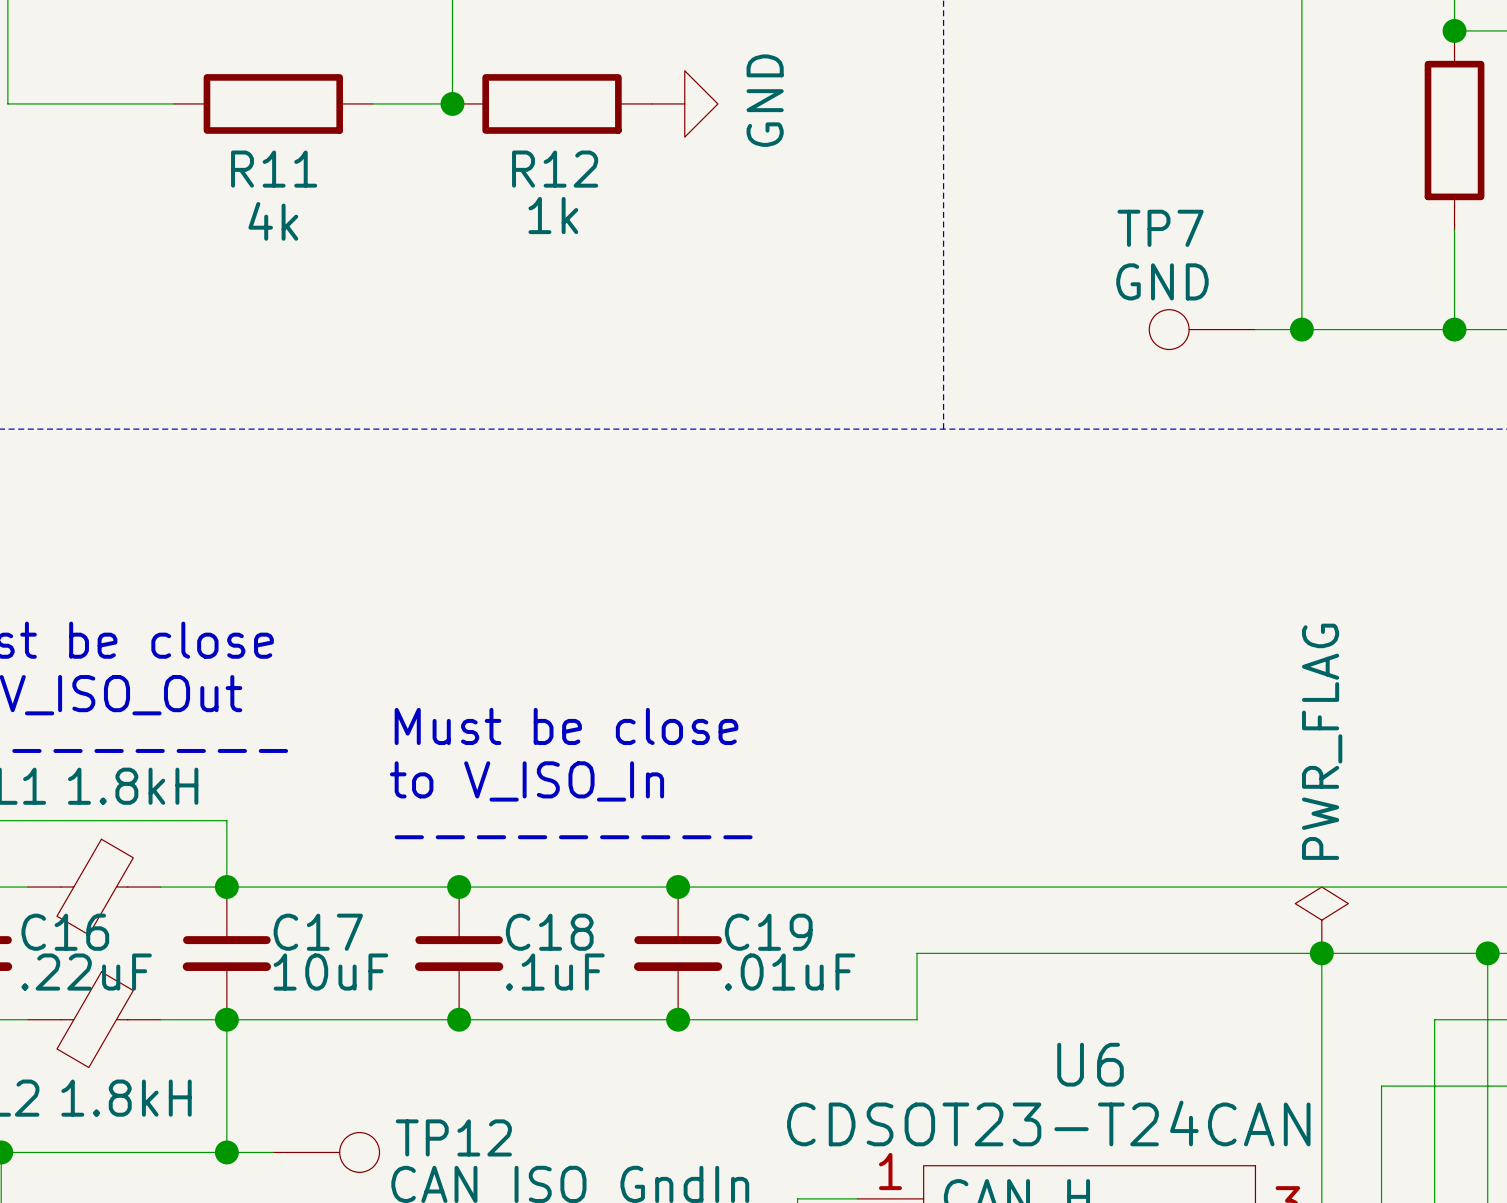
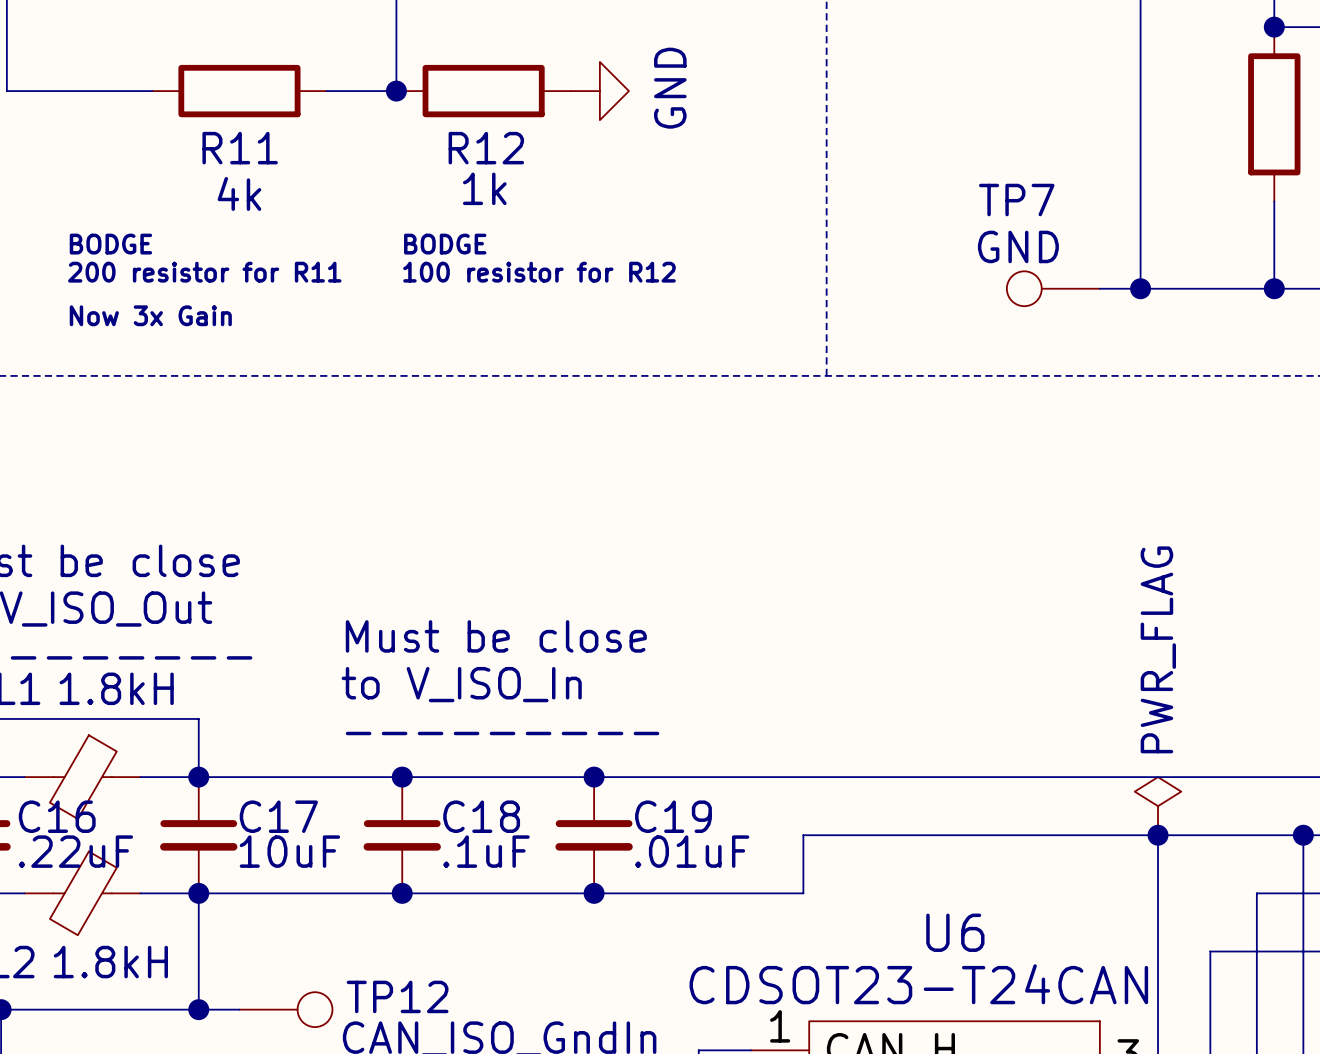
text: none -> BODGE (110, 244)
text: none -> BODGE (445, 244)
text: none -> 200 resistor for R11 (204, 272)
text: none -> 100 resistor for R12 (539, 272)
text: none -> Now 3x Gain (150, 315)

